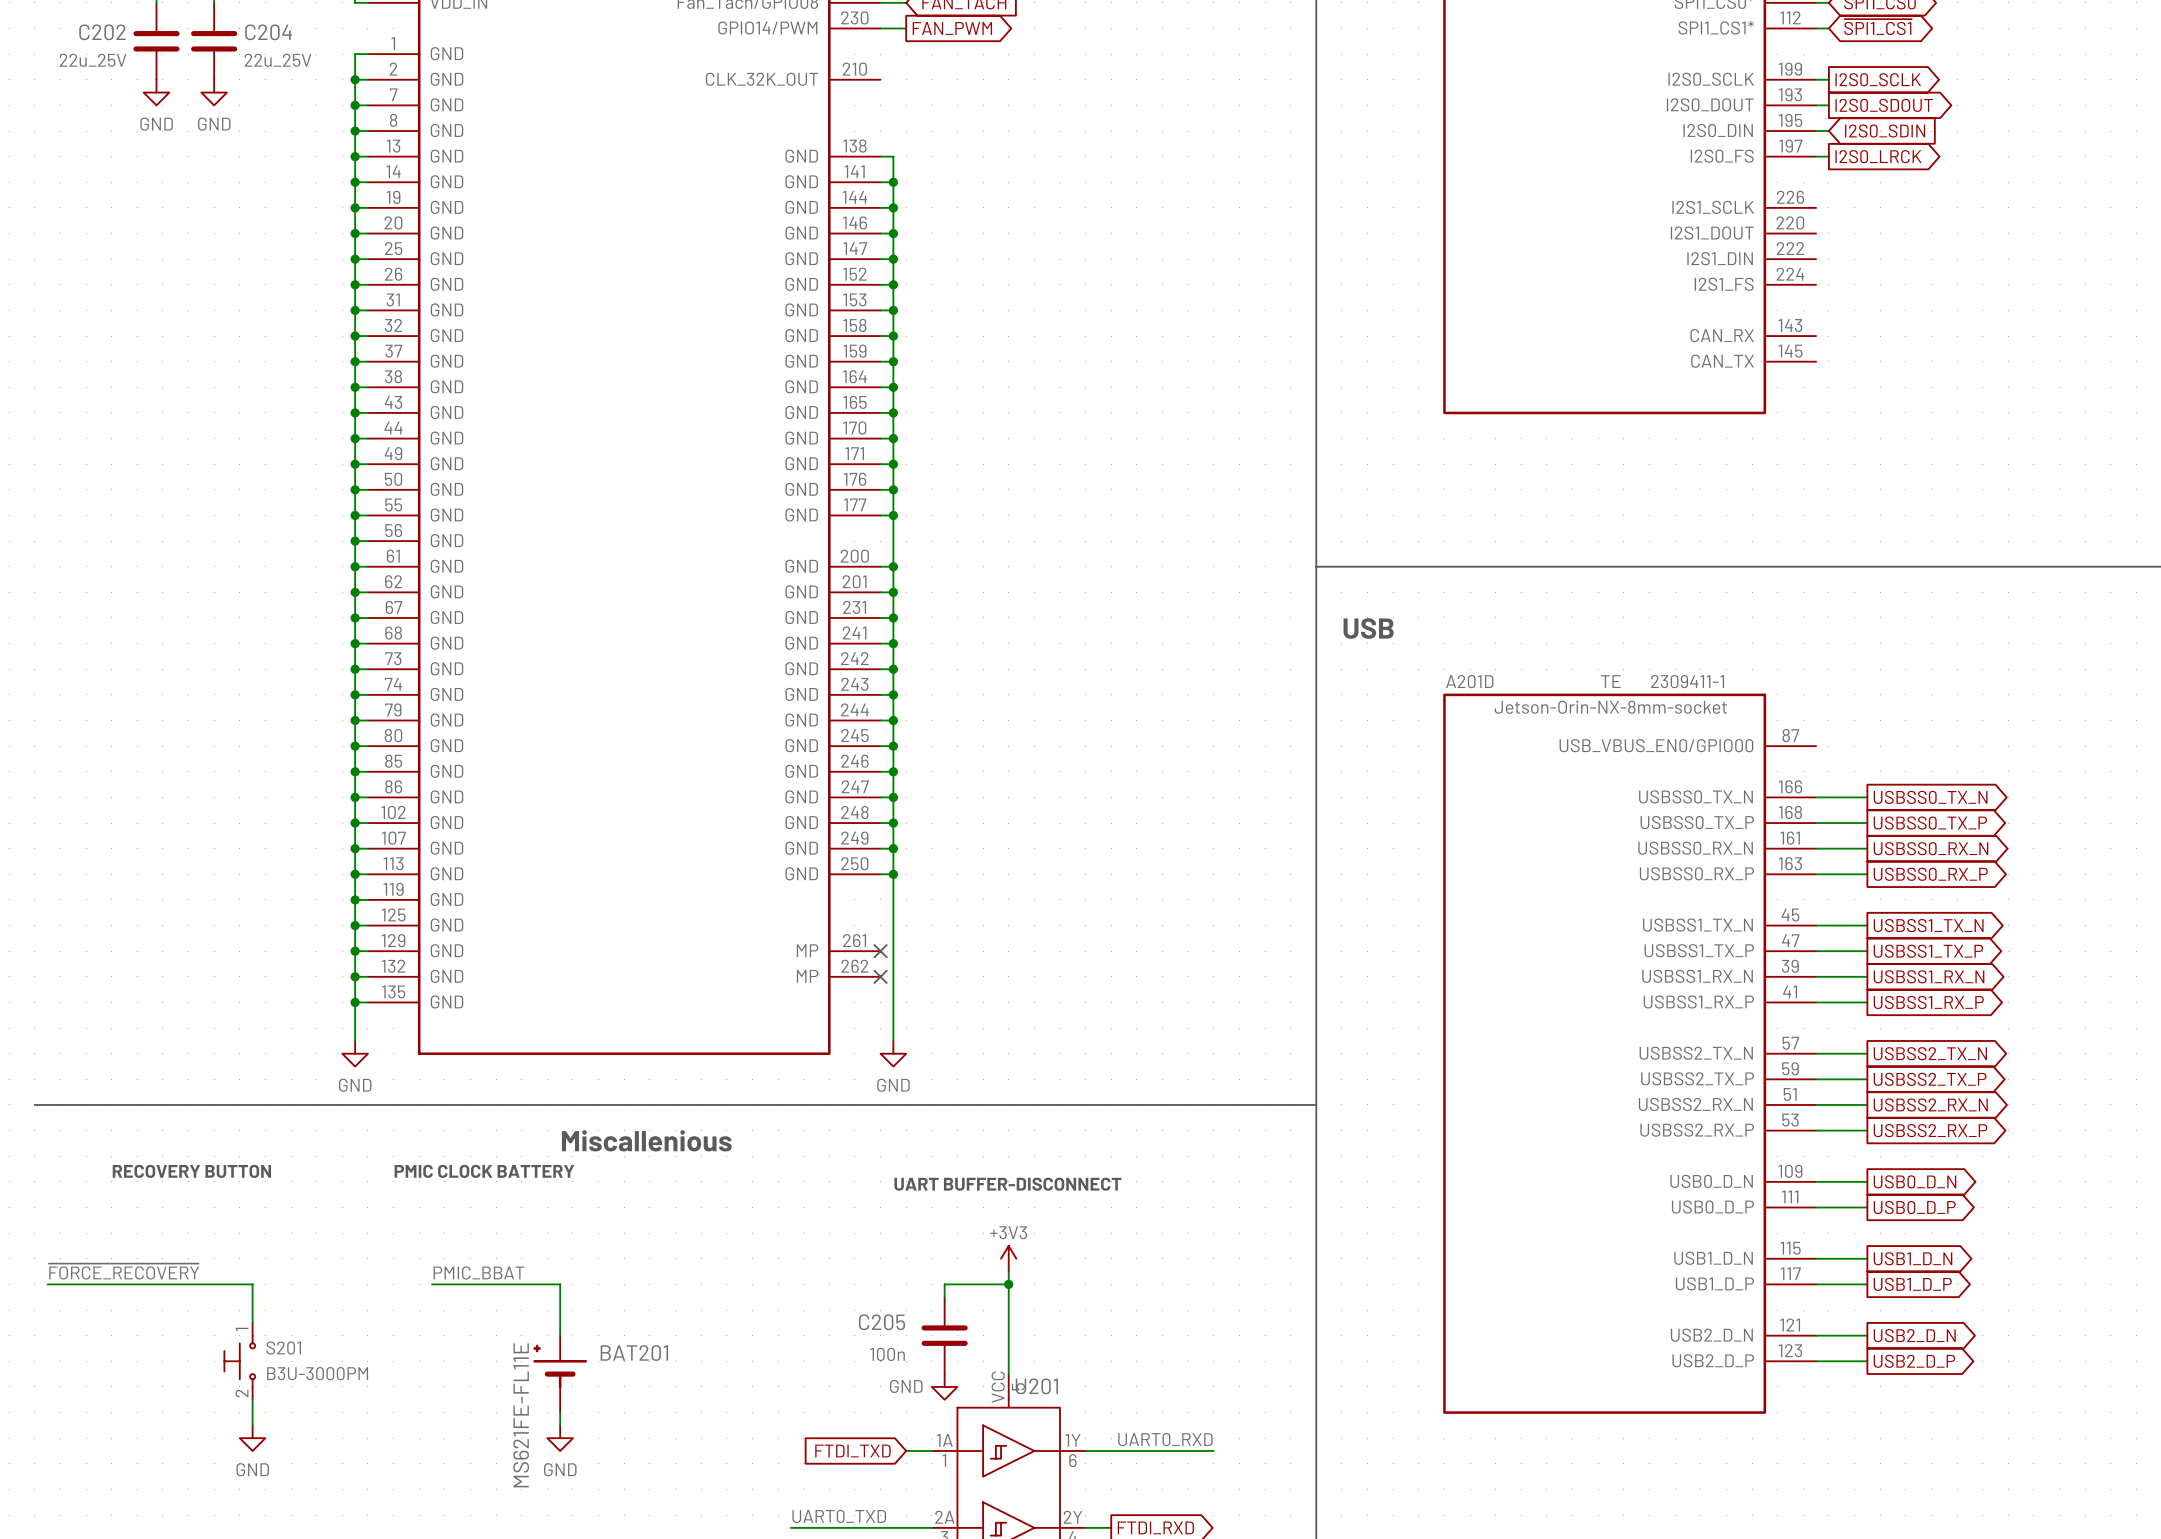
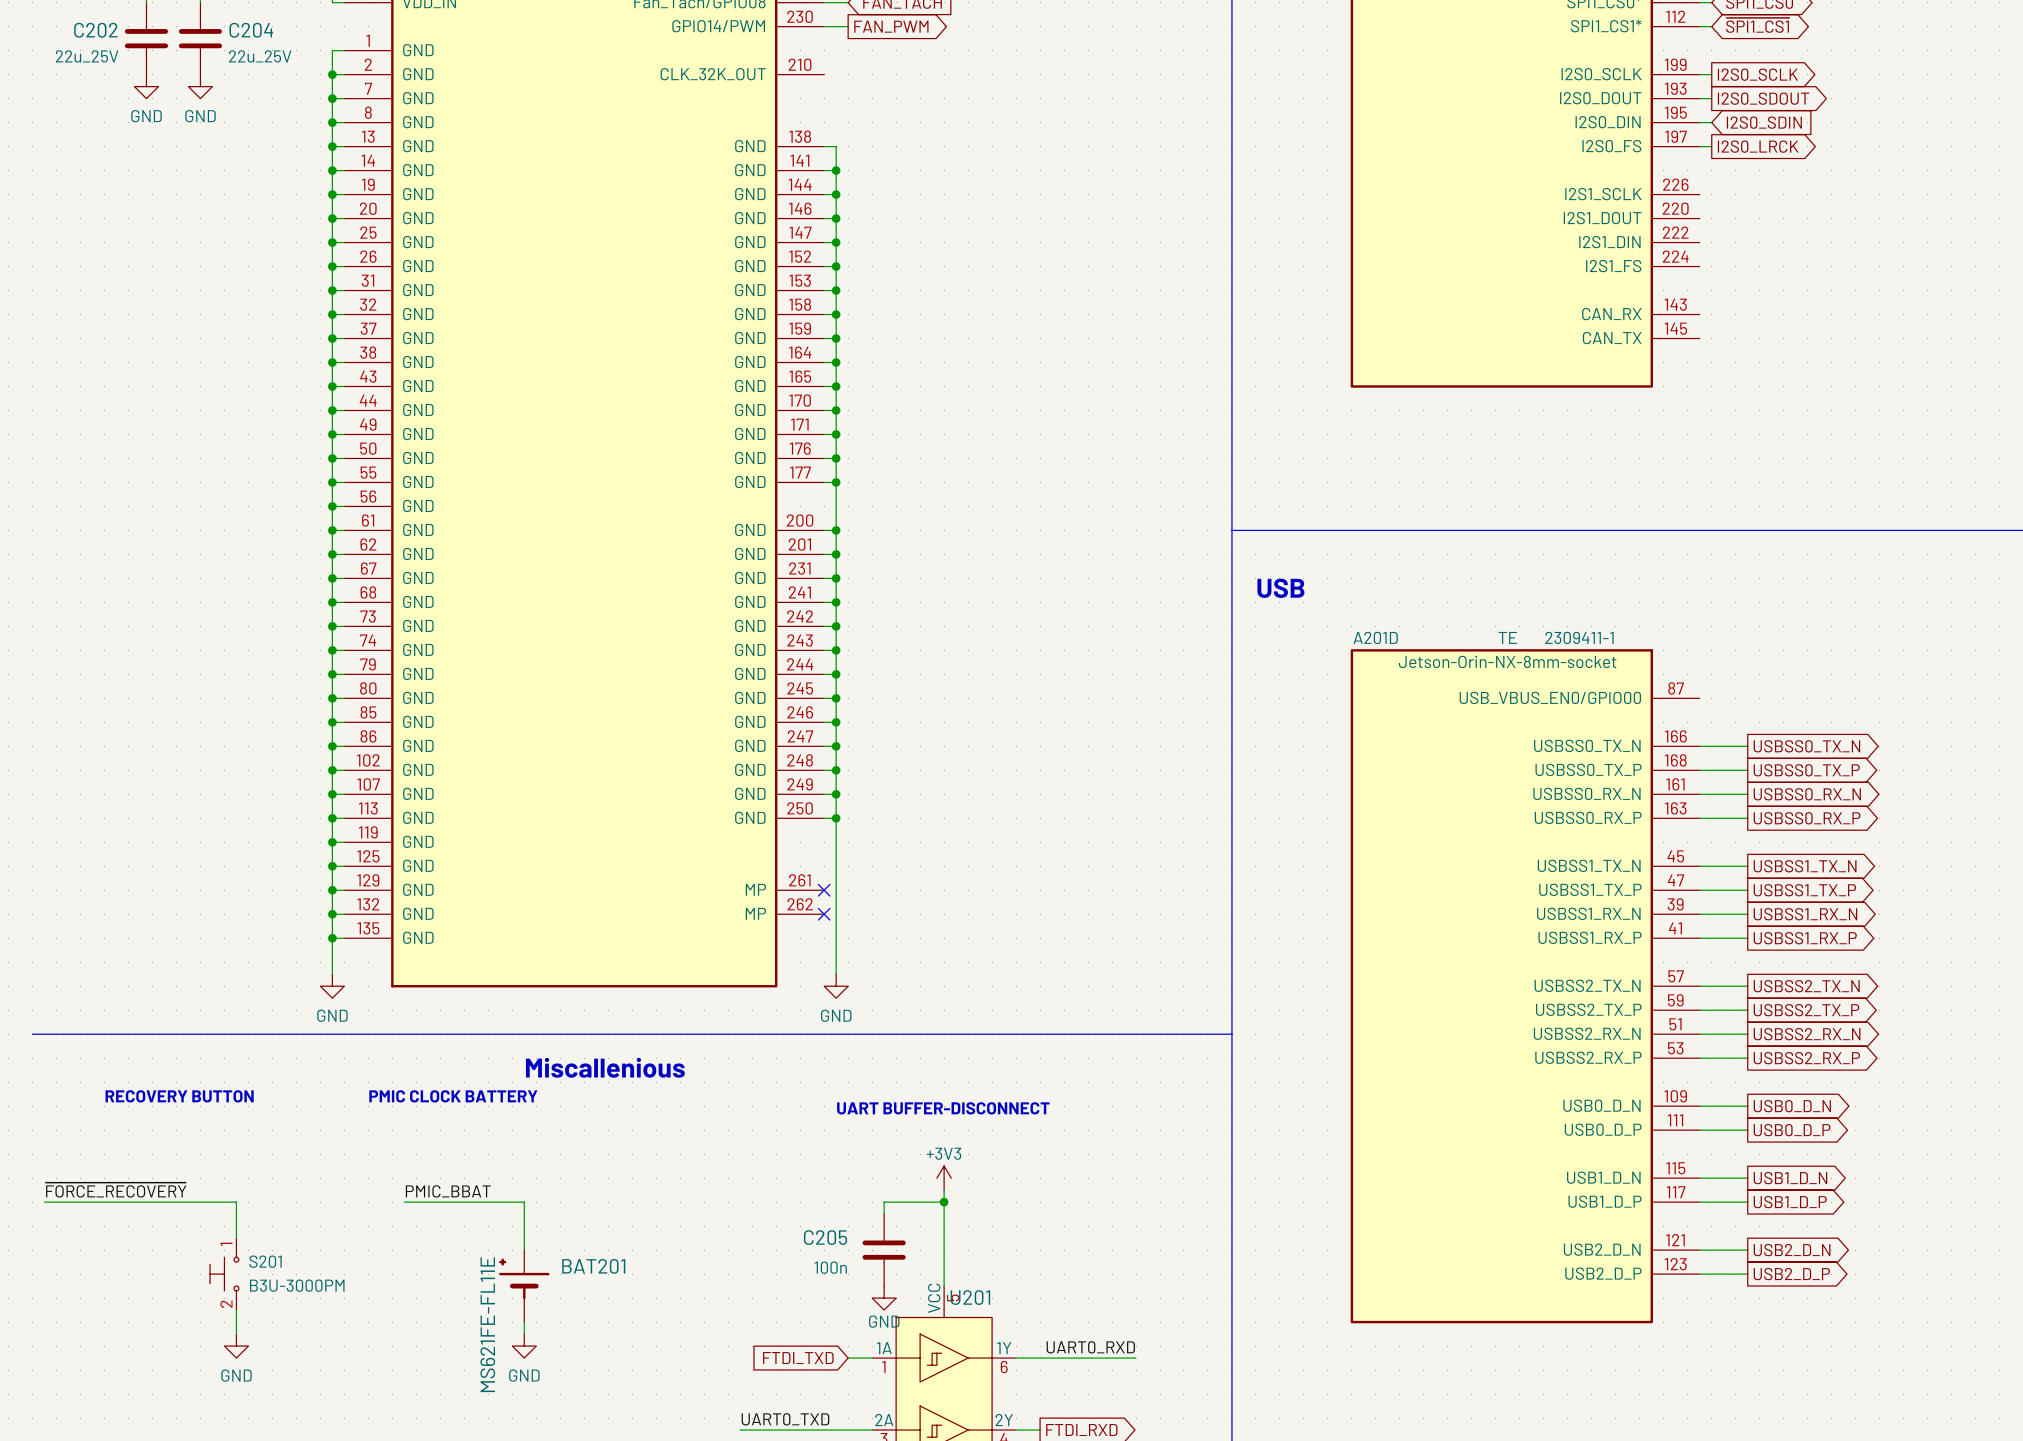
power symbol text position: GND (906, 1386) -> GND (884, 1321)

